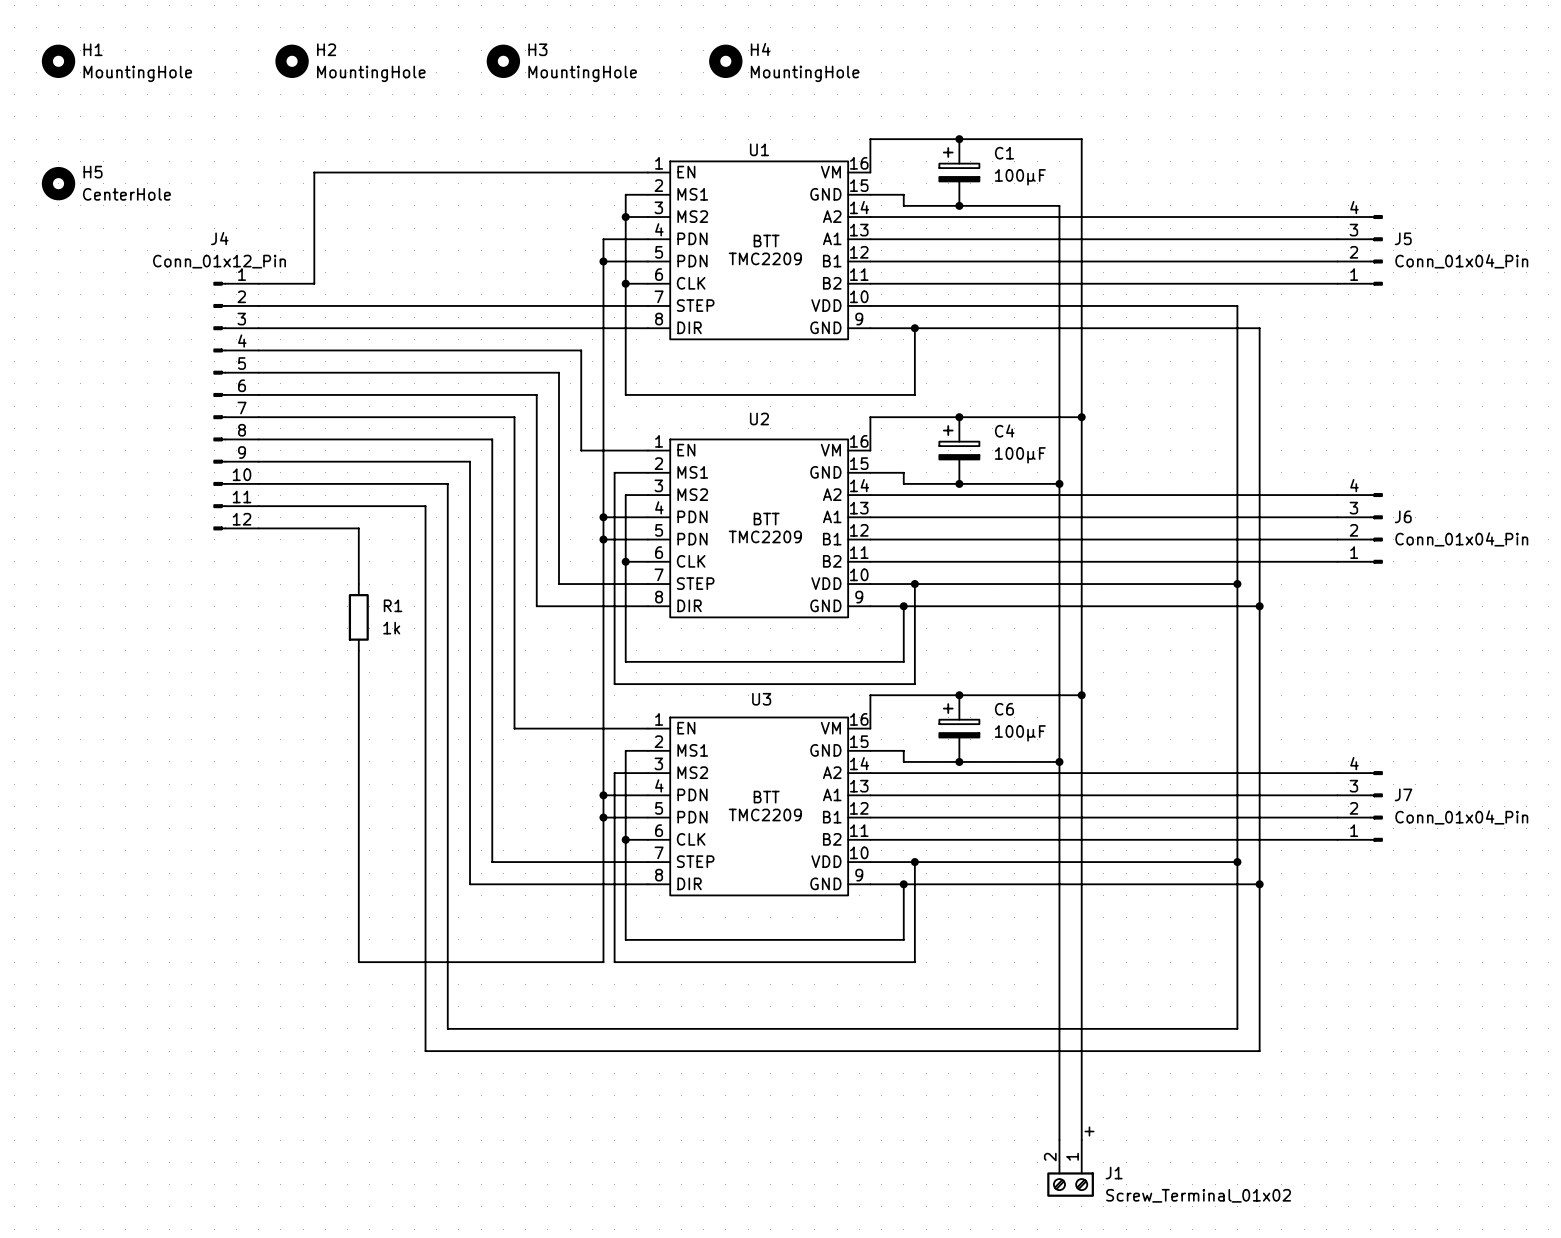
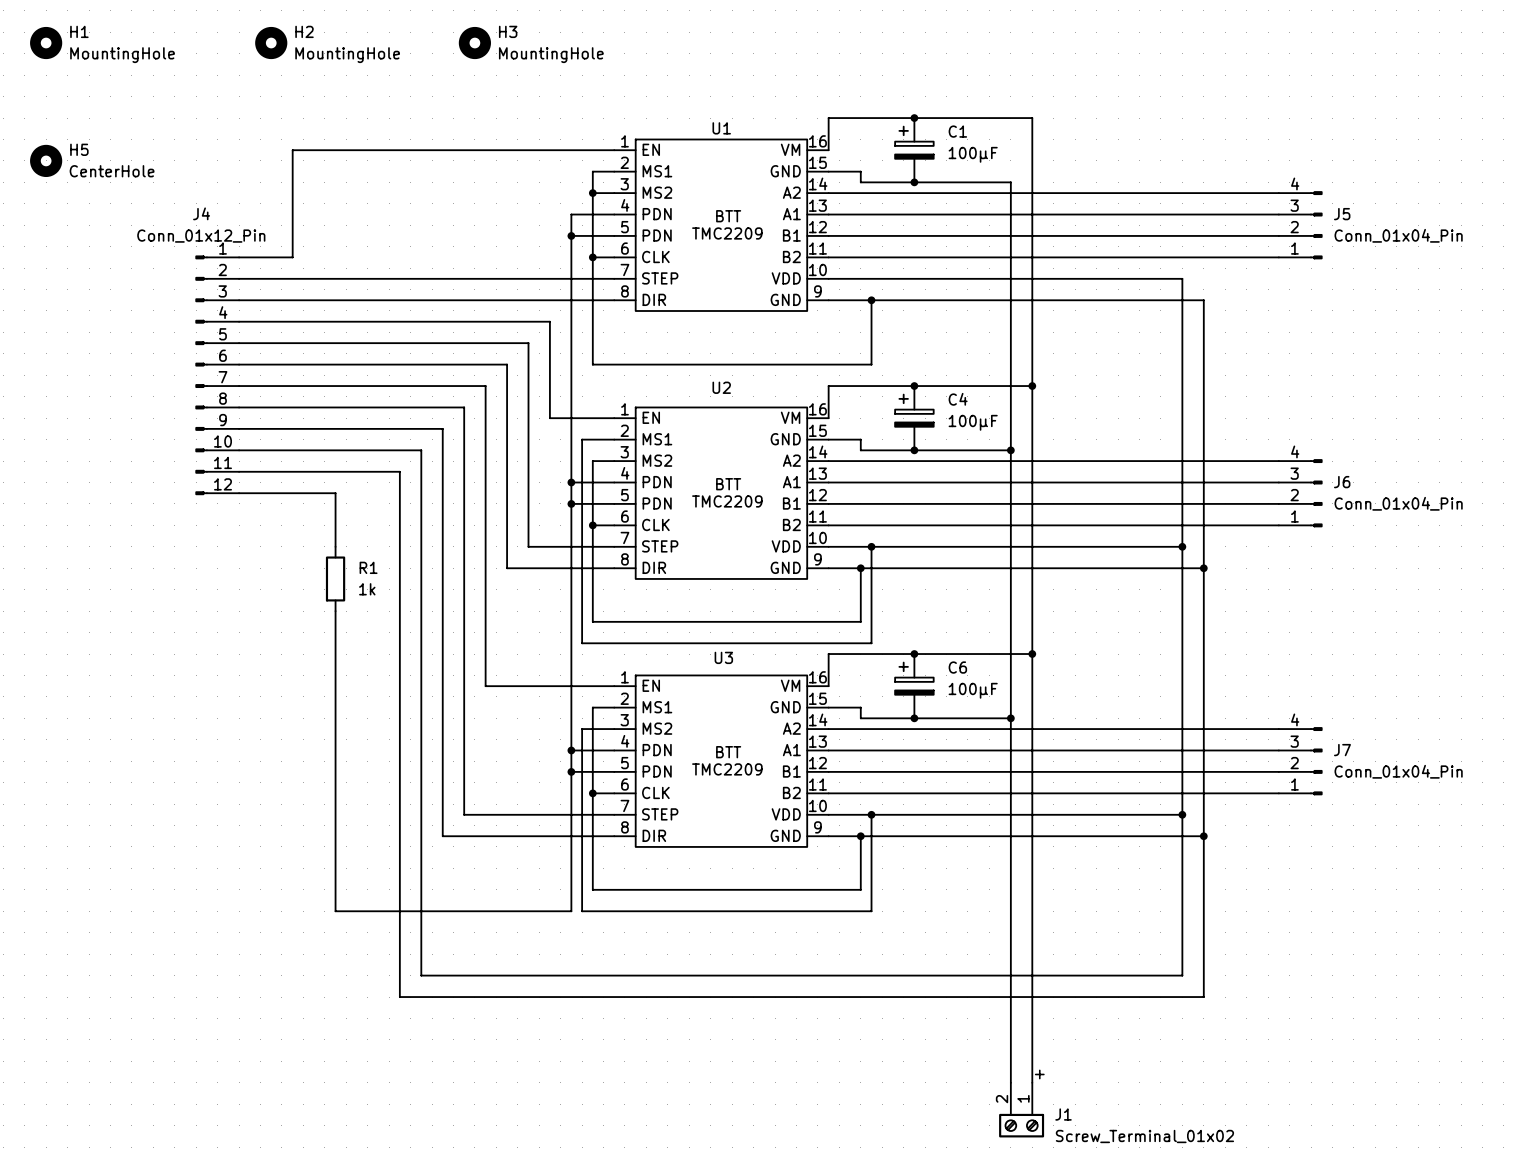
H4: MountingHole (725, 61) -> none

